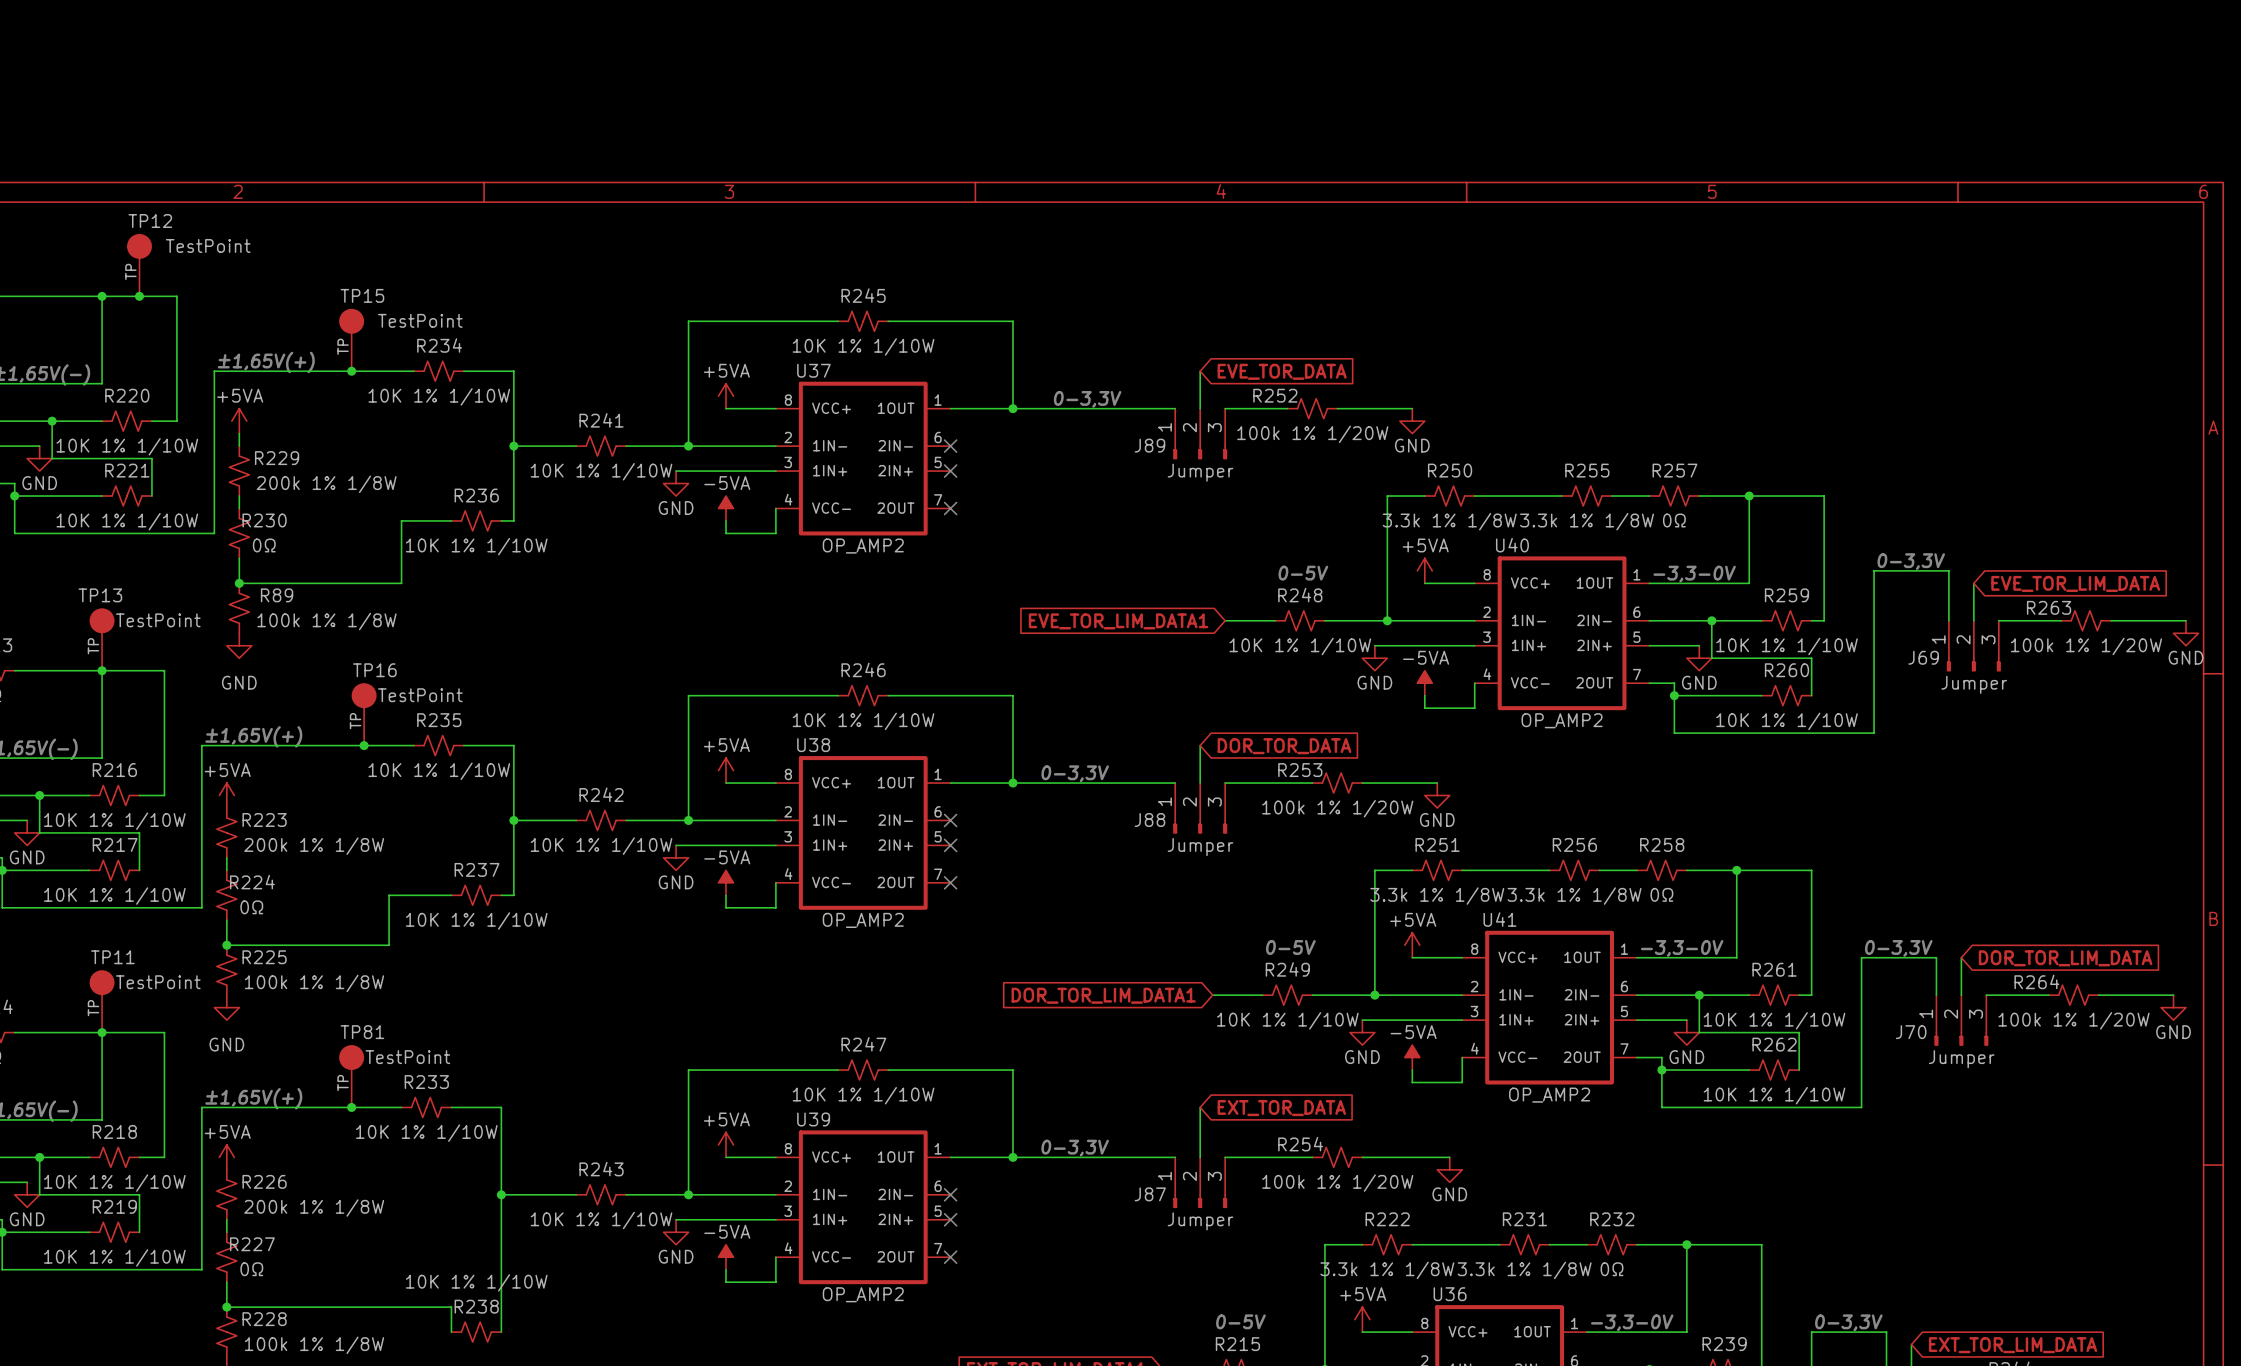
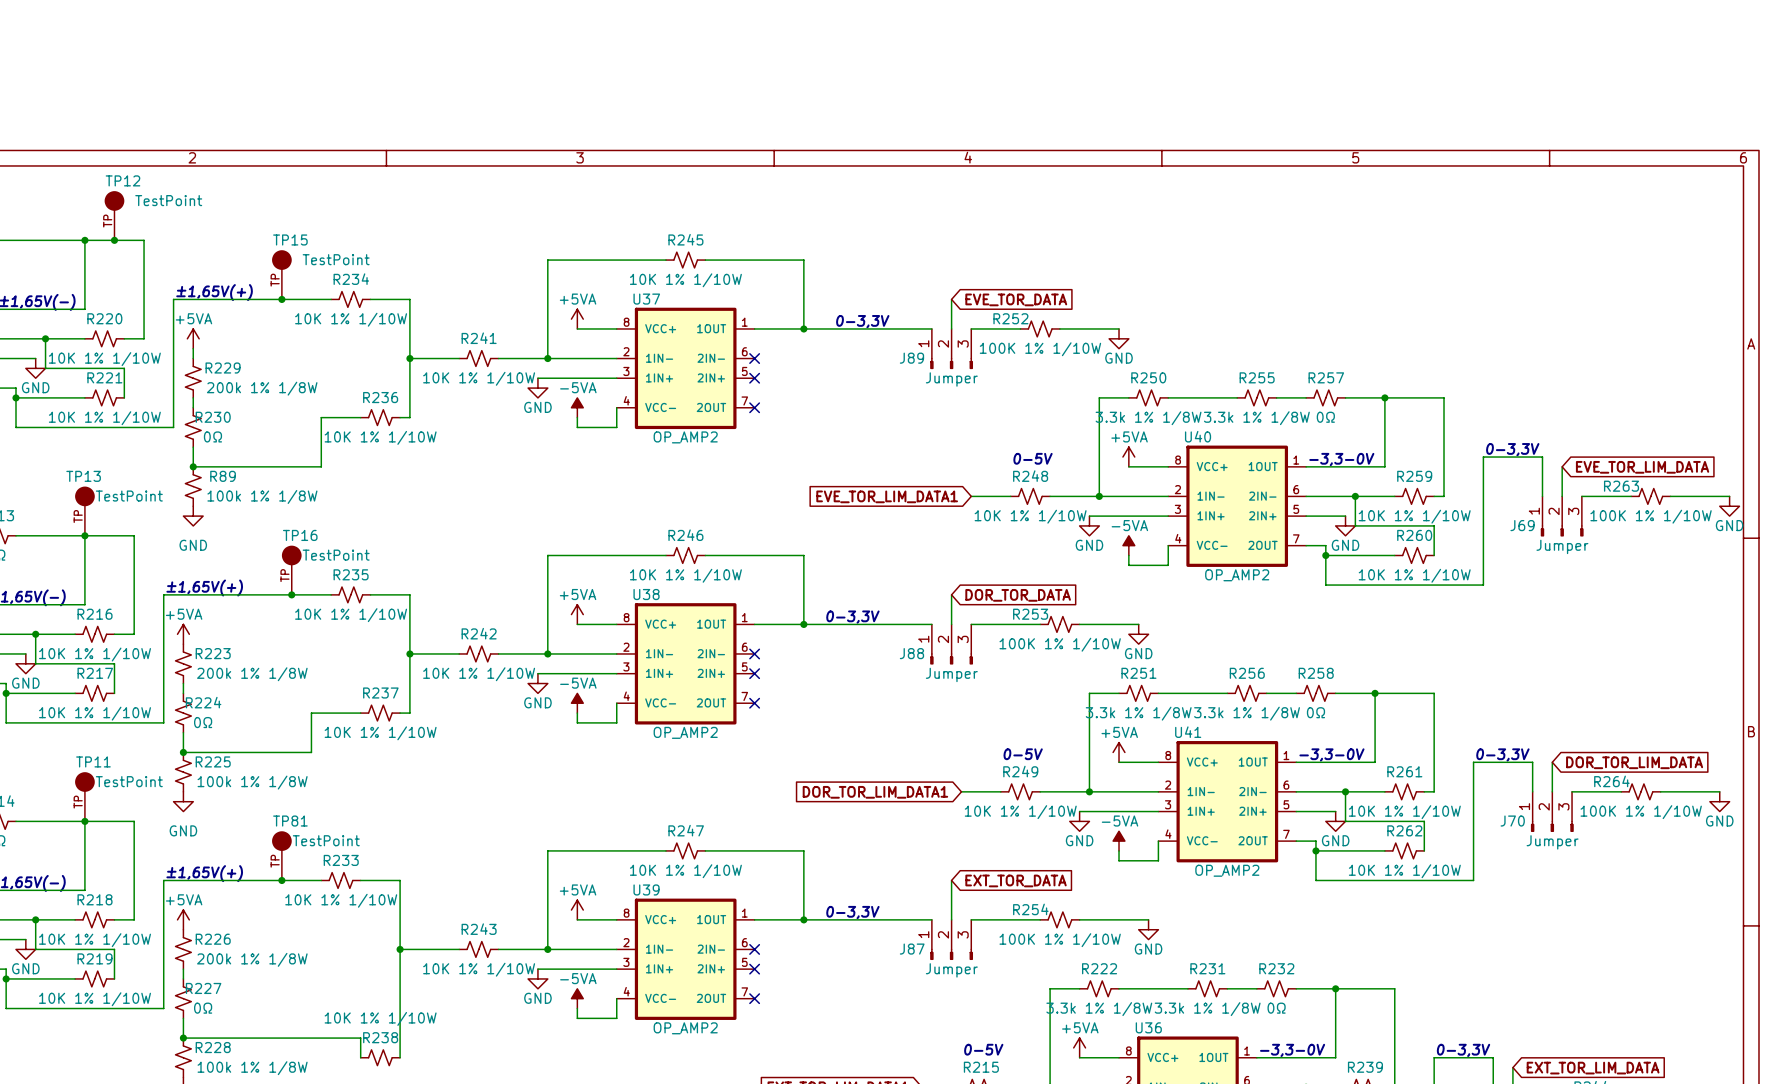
R252 value: 100k 1% 1/20W (1312, 434) -> 100K 1% 1/10W (1040, 349)
R263 value: 100k 1% 1/20W (2086, 646) -> 100K 1% 1/10W (1651, 516)
R253 value: 100k 1% 1/20W (1337, 808) -> 100K 1% 1/10W (1060, 644)
R264 value: 100k 1% 1/20W (2073, 1020) -> 100K 1% 1/10W (1641, 812)
R254 value: 100k 1% 1/20W (1337, 1183) -> 100K 1% 1/10W (1060, 940)

